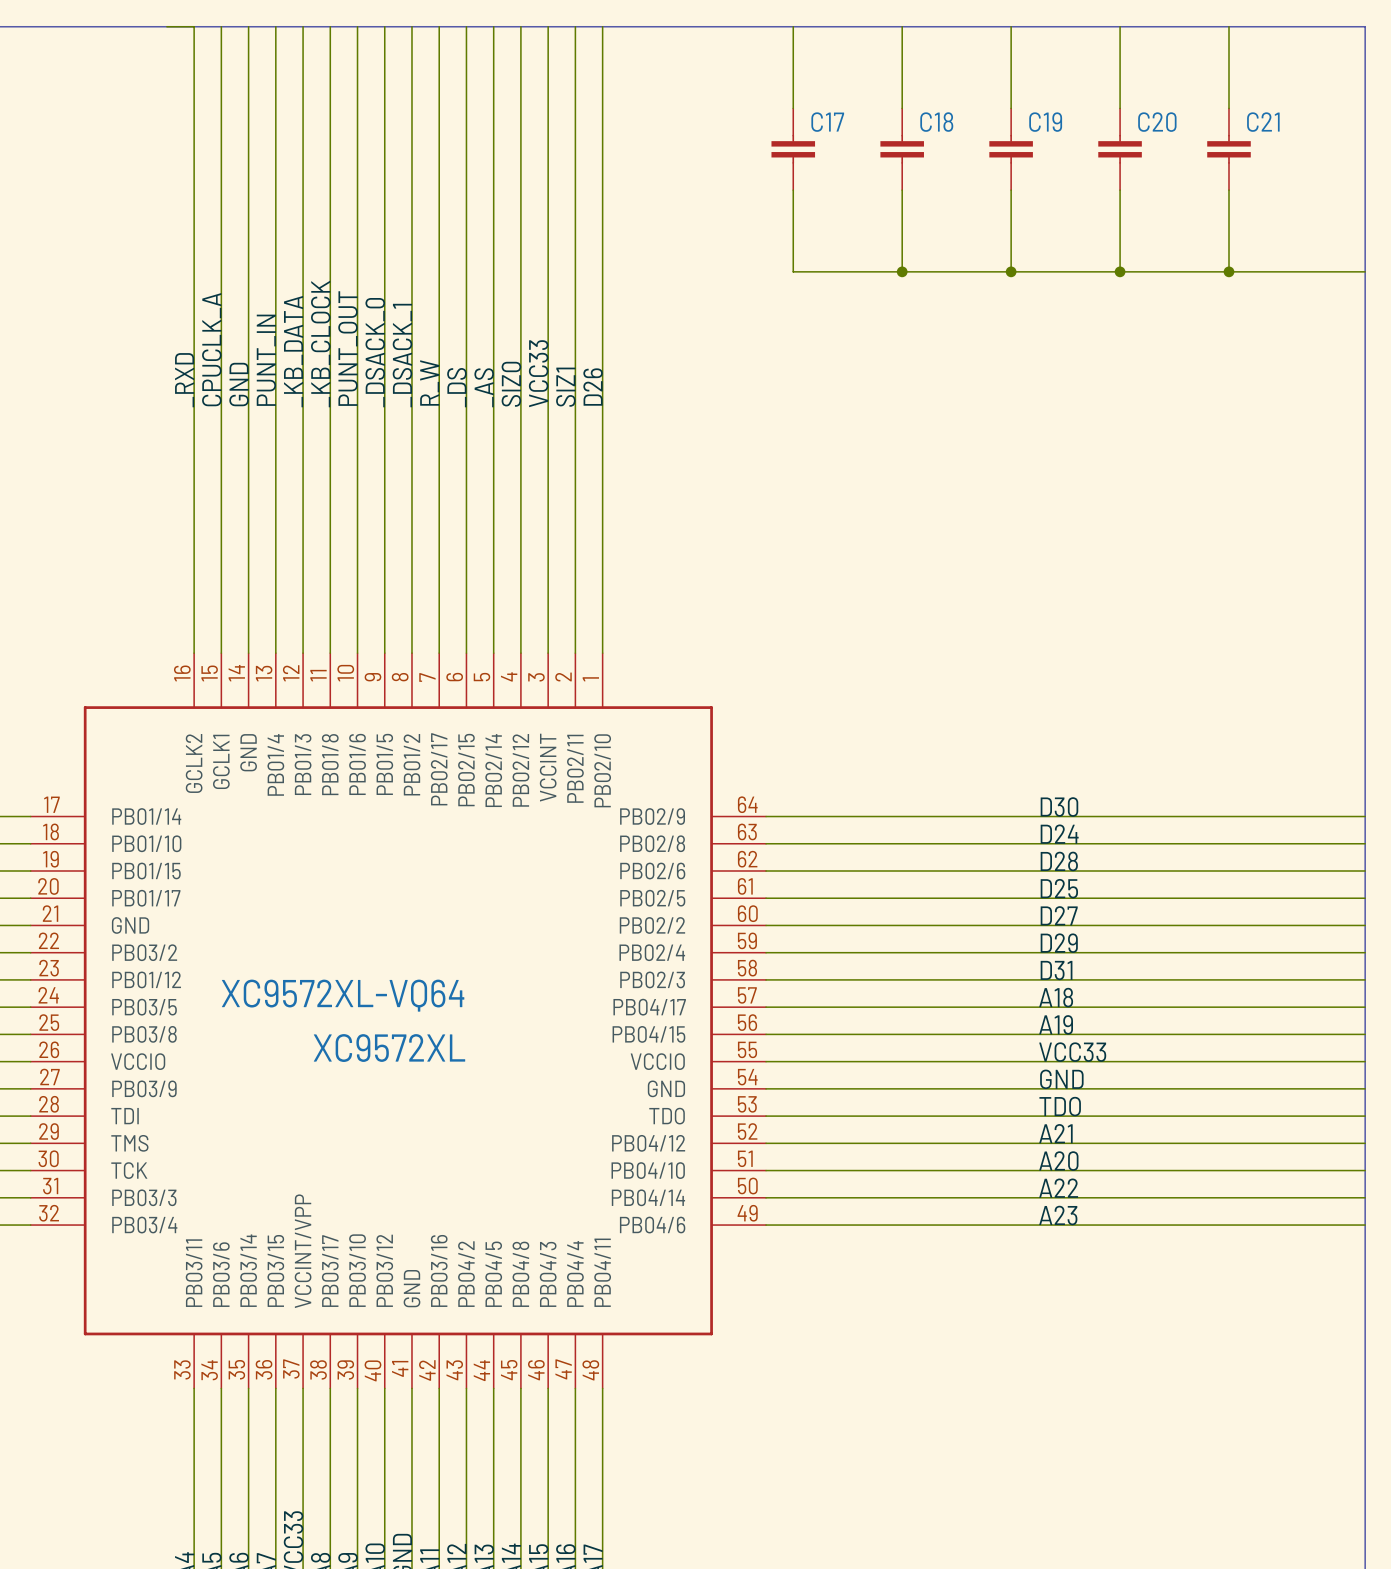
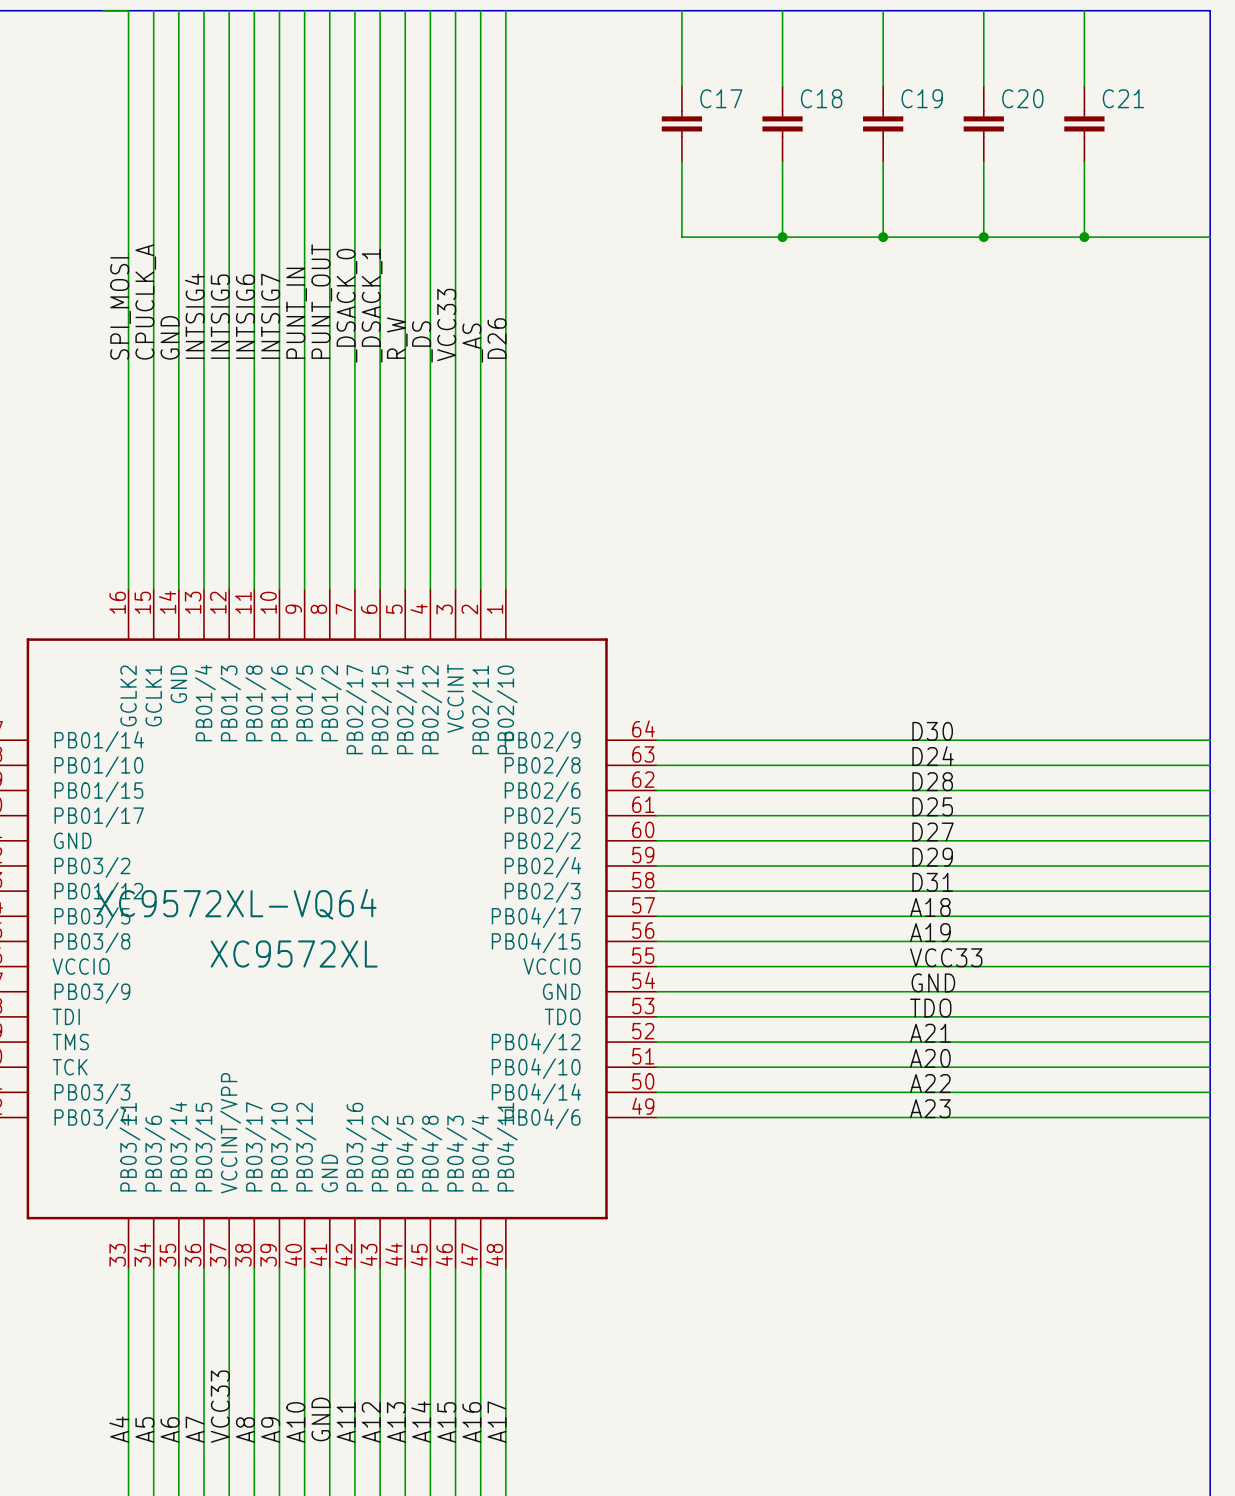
label: _KB_CLOCK (320, 344) -> INTSIG6 (245, 316)
label: PUNT_OUT (347, 348) -> INTSIG7 (270, 316)
label: _KB_DATA (293, 351) -> INTSIG5 (220, 316)
label: _DSACK_0 (375, 352) -> PUNT_IN (296, 313)
label: _DSACK_1 (402, 355) -> PUNT_OUT (321, 301)
label: PUNT_IN (266, 360) -> INTSIG4 (194, 316)
label: _RXD (184, 380) -> SPI_MOSI (120, 308)
label: R_W (429, 383) -> _DSACK_0 (346, 305)
label: SIZ0 (511, 384) -> _DS (422, 341)
label: _DS (456, 387) -> _DSACK_1 (372, 305)
label: _AS (484, 387) -> R_W (397, 338)
label: SIZ1 (565, 387) -> _AS (472, 343)

